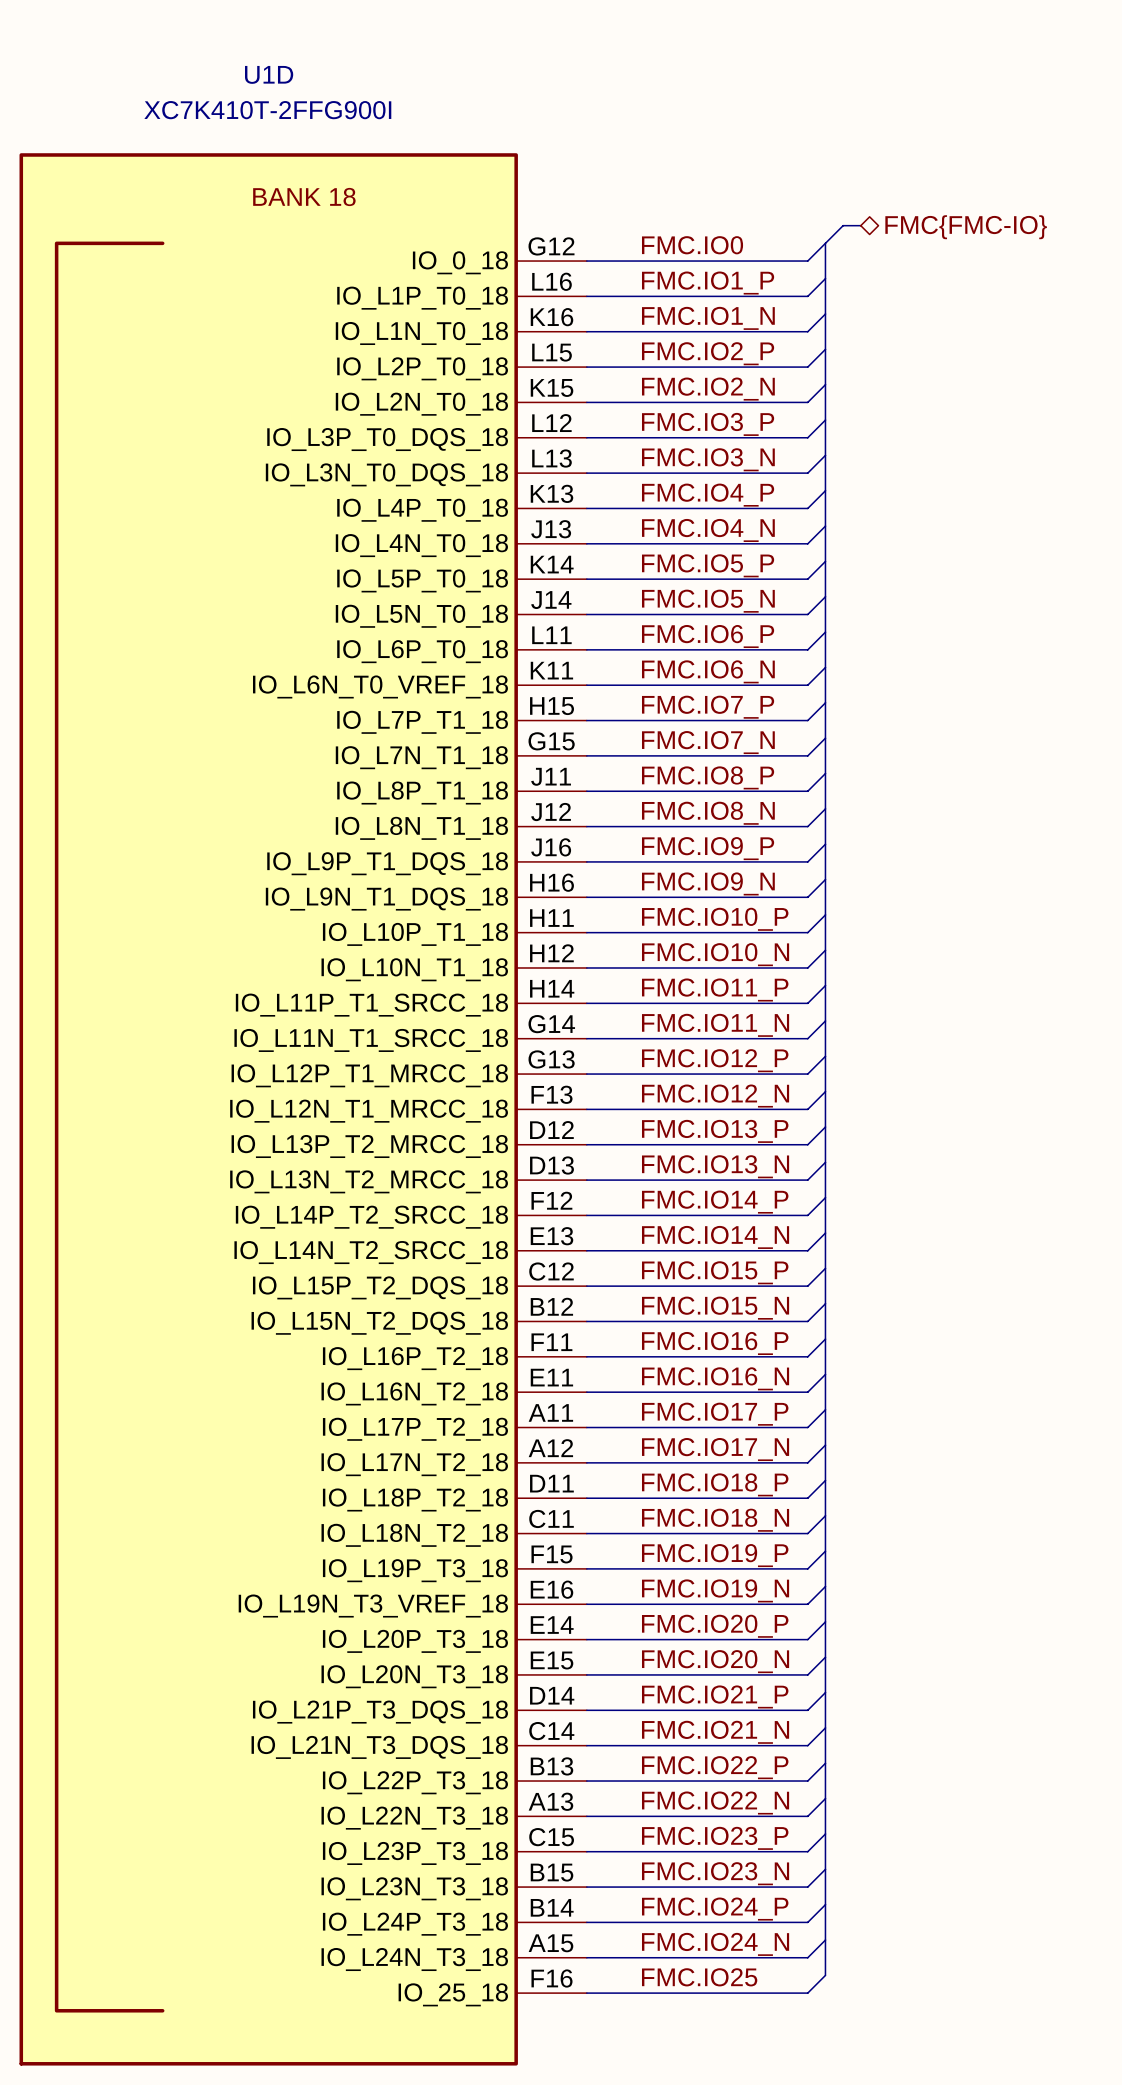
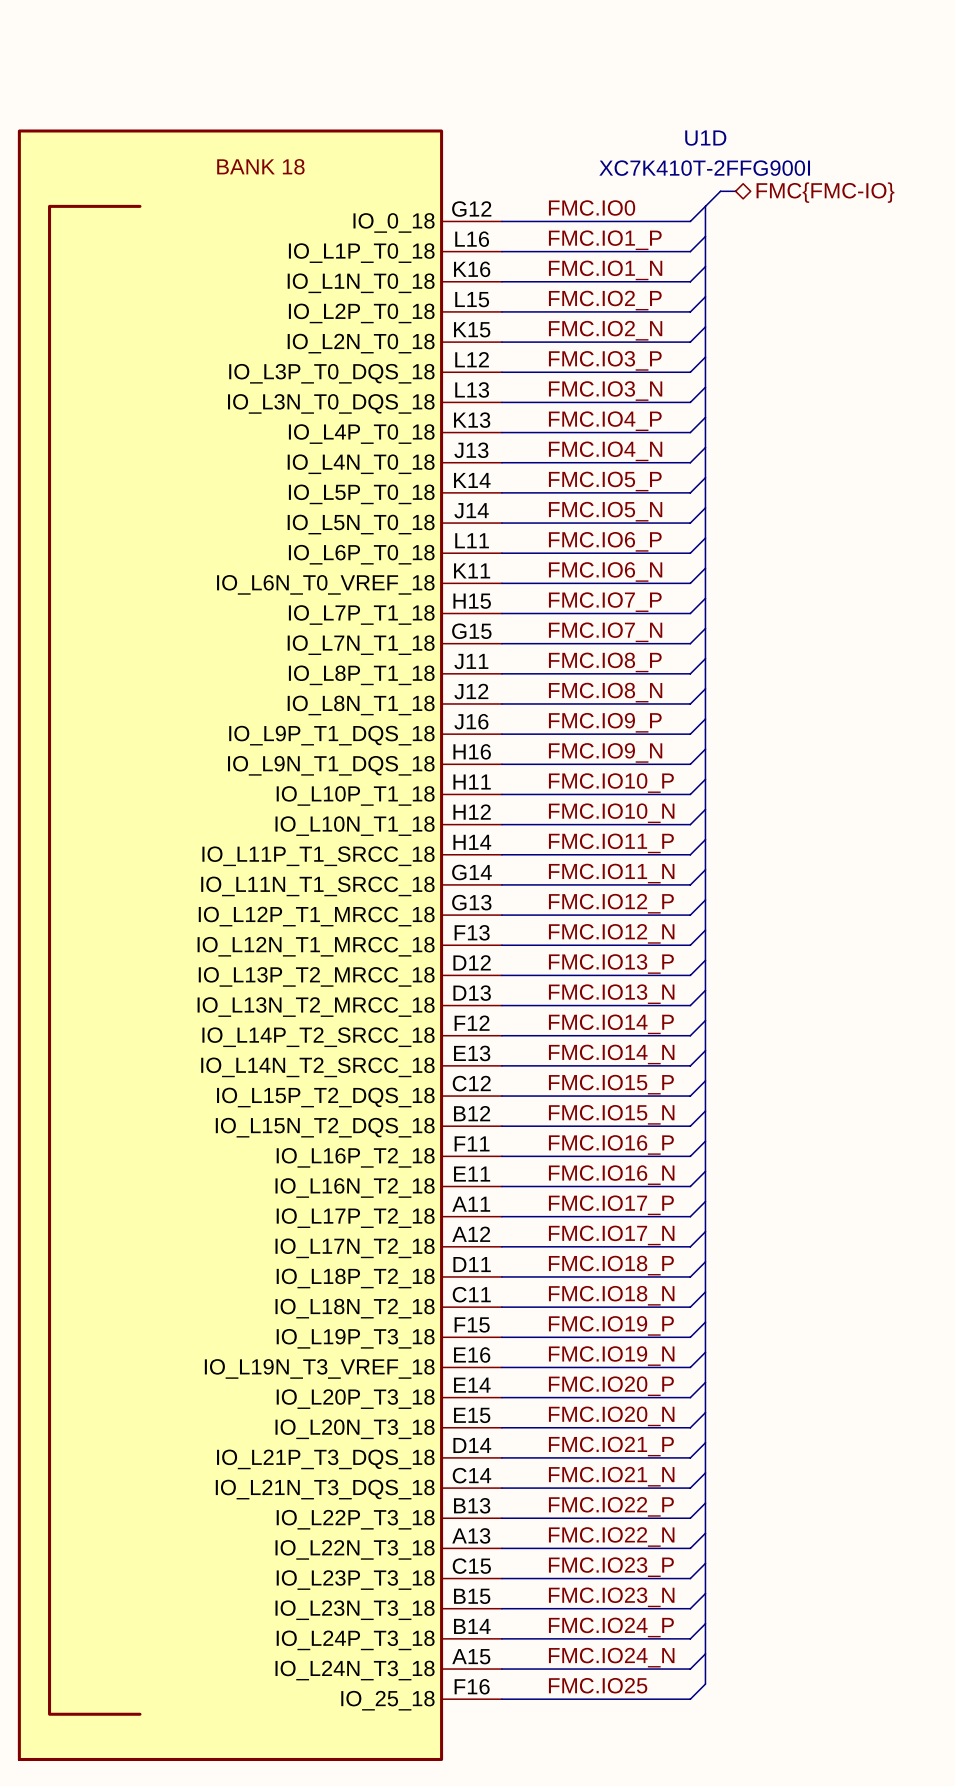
U1D name position: U1D (269, 74) -> U1D (705, 138)
U1D value position: XC7K410T-2FFG900I (267, 110) -> XC7K410T-2FFG900I (704, 168)

